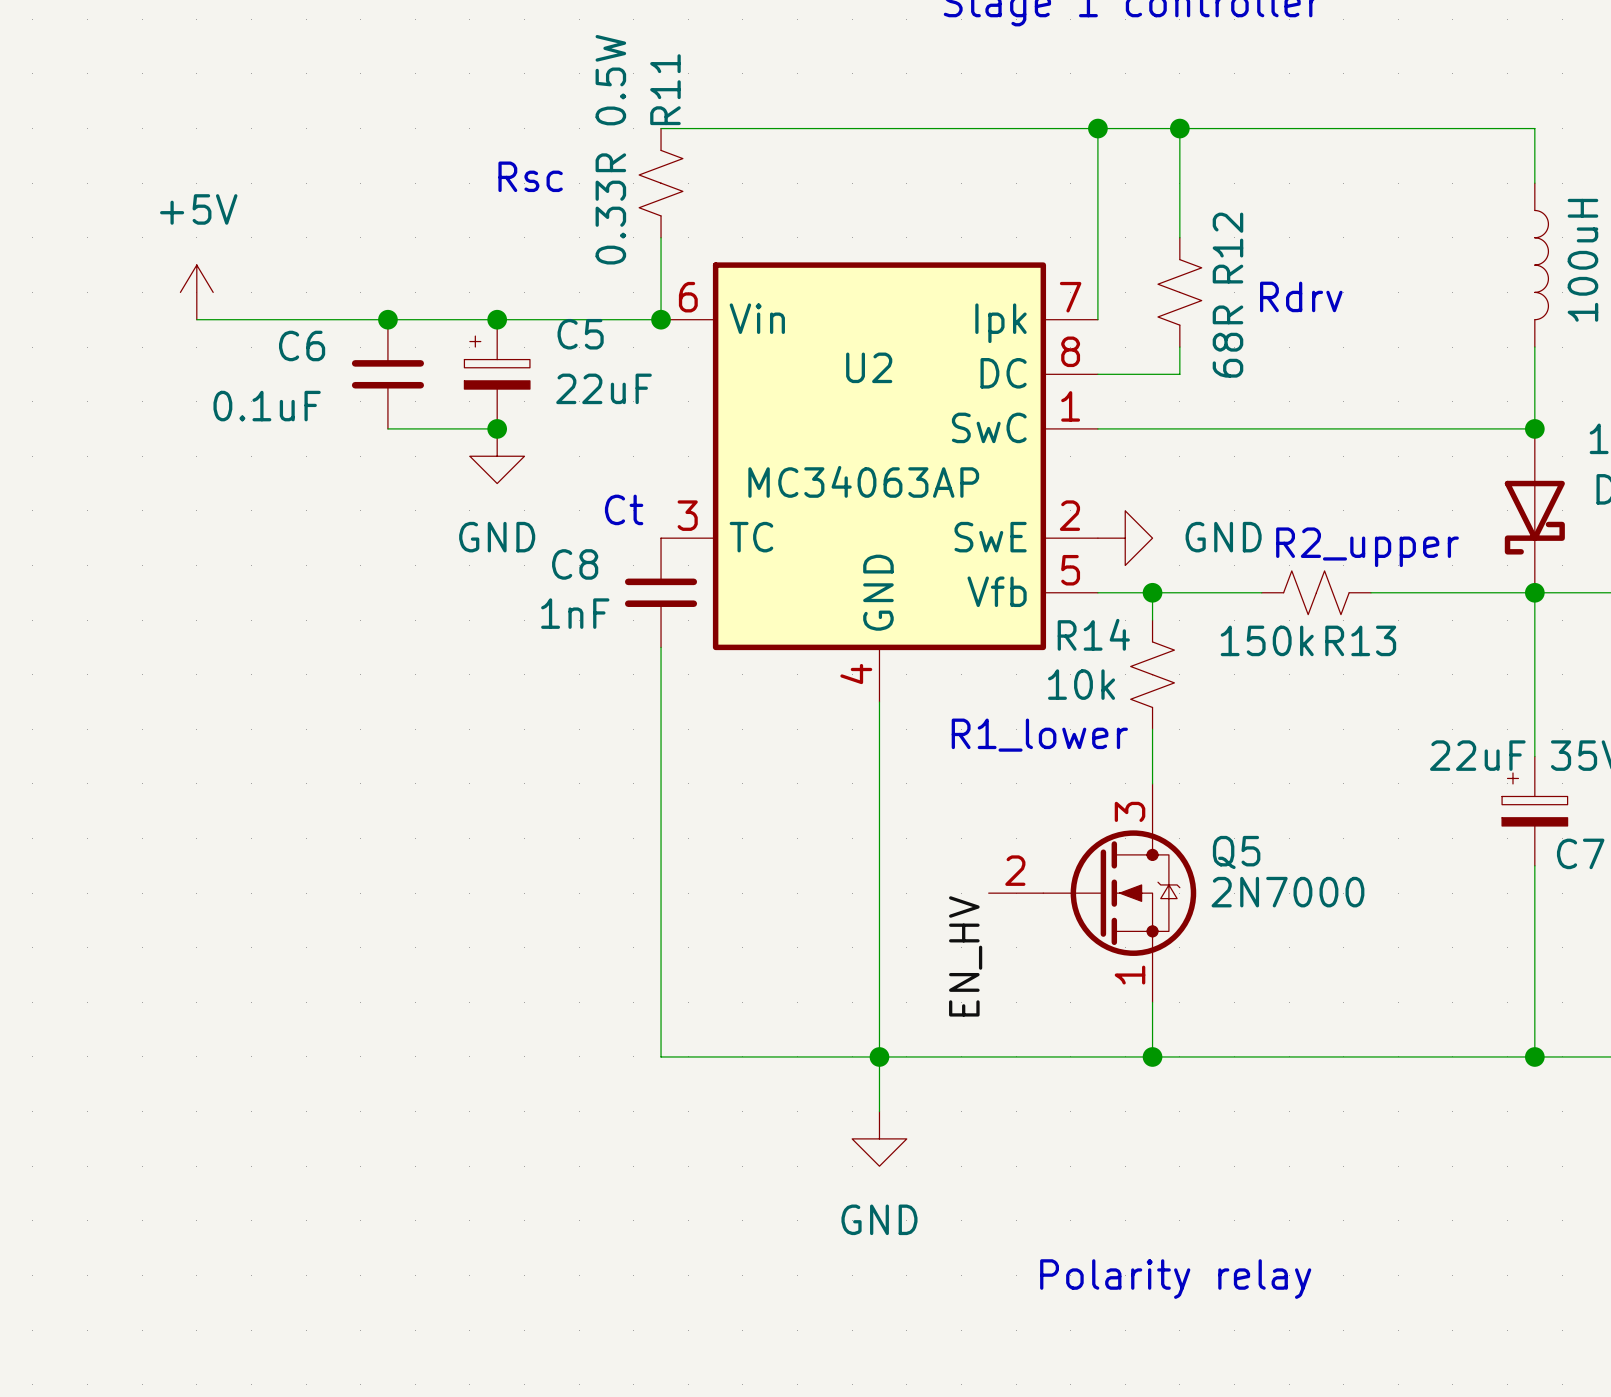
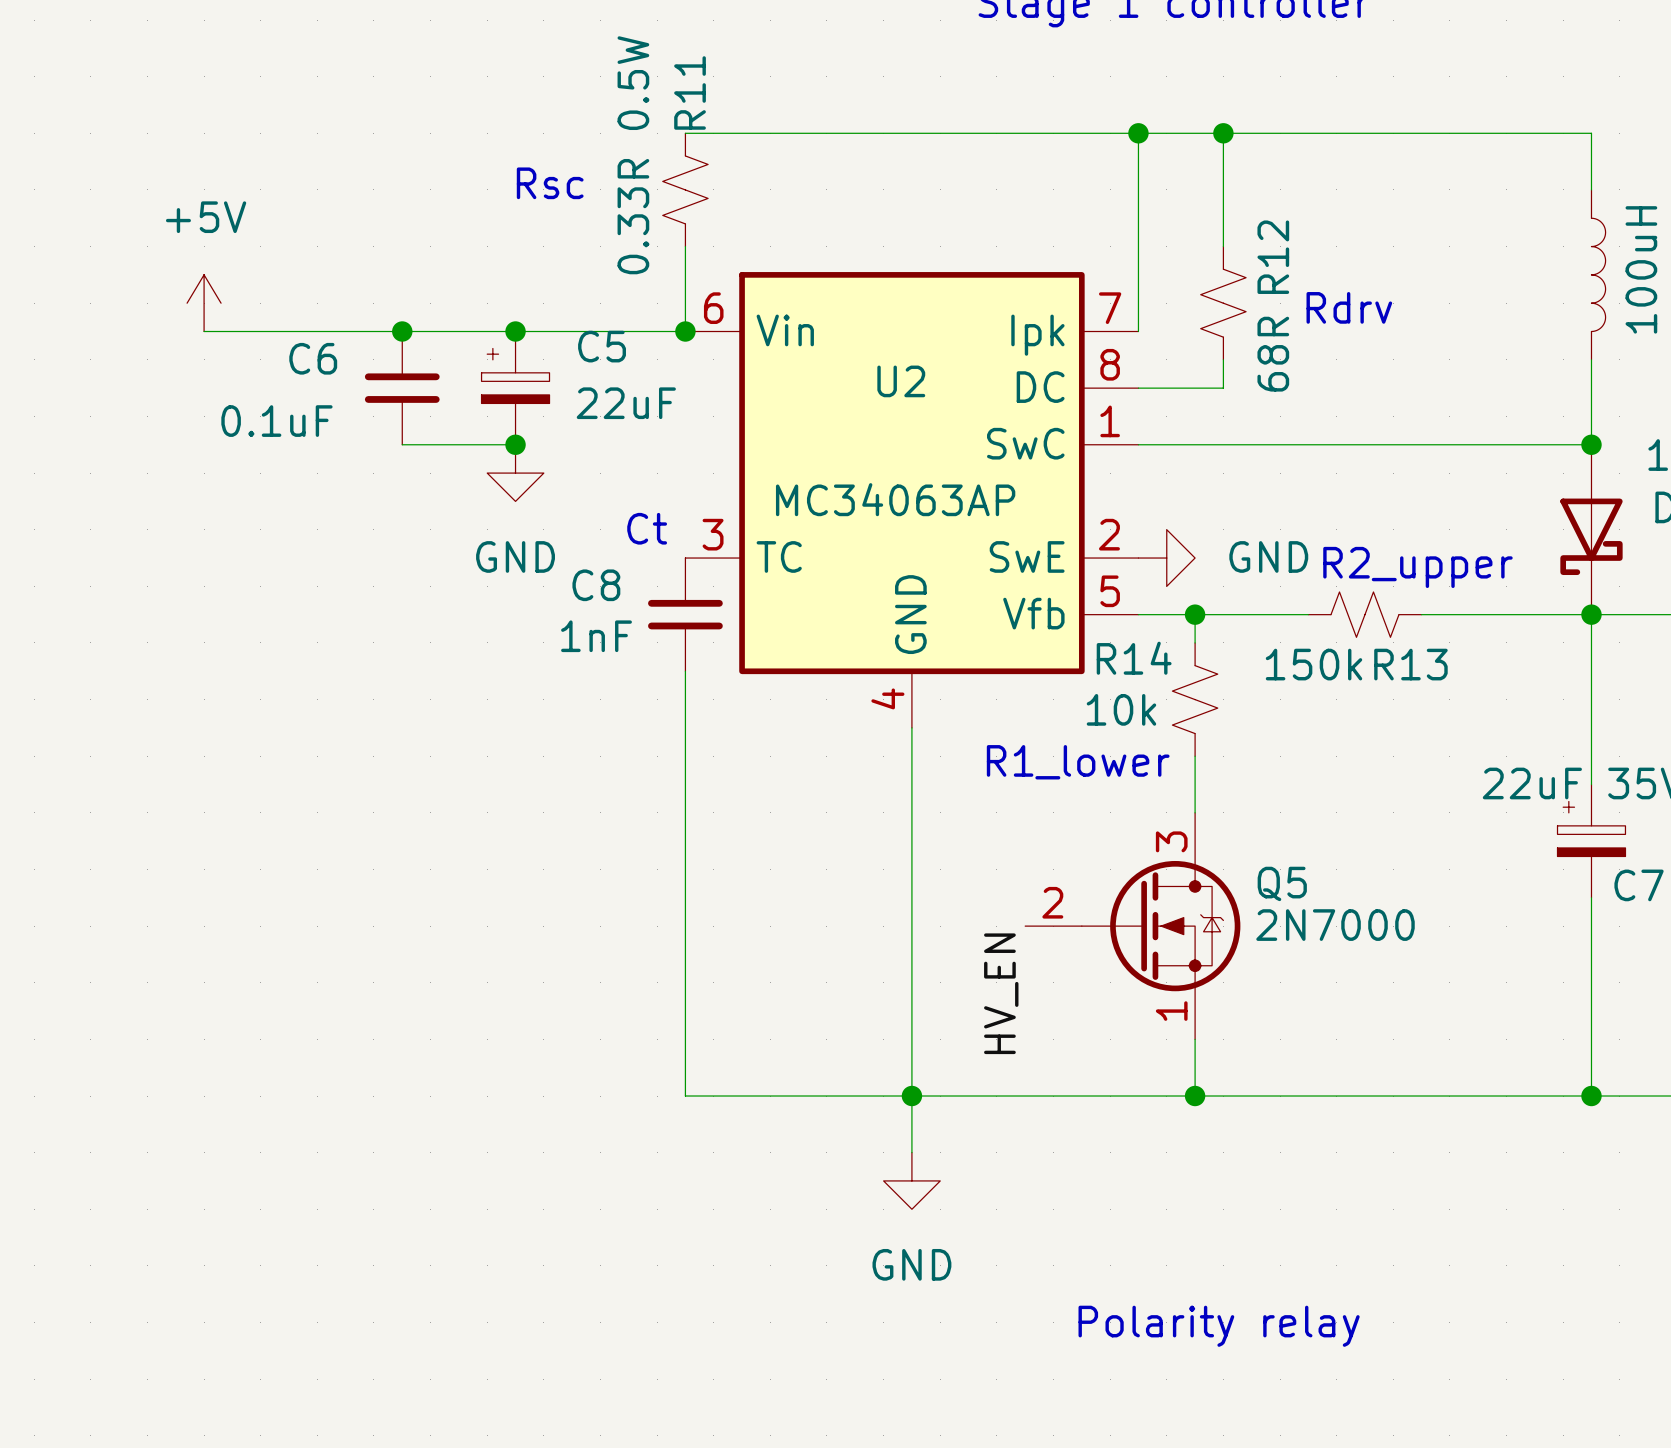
label: EN_HV (965, 956) -> HV_EN (1001, 993)

